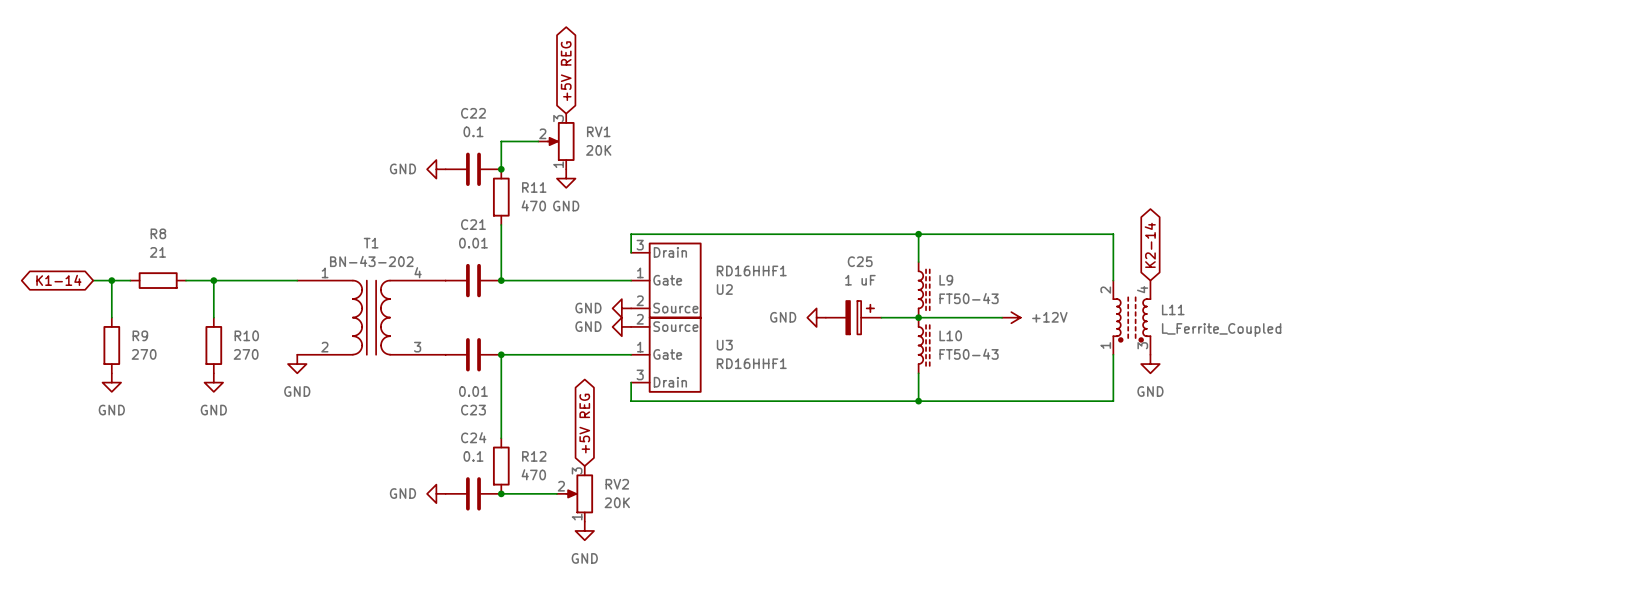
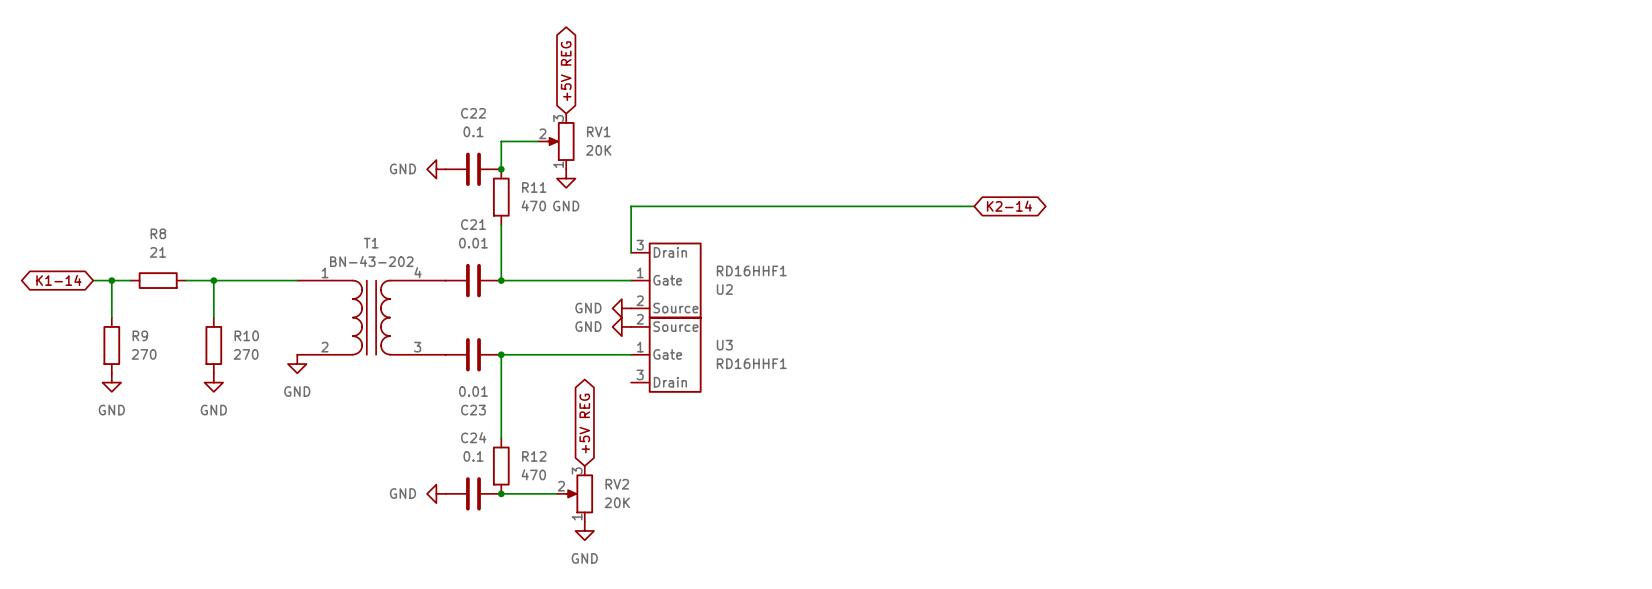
global label: none -> K2-14 (1009, 206)
wire: (631, 234) (1113, 234) (1113, 280) -> (631, 234) (631, 206) (974, 206)
wire: (918, 234) (918, 262) -> none
junction: (918, 234) -> none
global label: K2-14 (1150, 245) -> none
L9: FT50-43 (924, 289) -> none
power symbol: GND (816, 317) -> none
C25: 1 uF (853, 317) -> none
wire: (881, 317) (1002, 317) -> none
junction: (918, 317) -> none
power symbol: +12V (1011, 317) -> none
L11: L_Ferrite_Coupled (1131, 317) -> none
L10: FT50-43 (924, 345) -> none
wire: (1113, 354) (1113, 401) (631, 401) (631, 382) -> none
power symbol: GND (1150, 364) -> none
wire: (918, 373) (918, 401) -> none
junction: (918, 401) -> none

